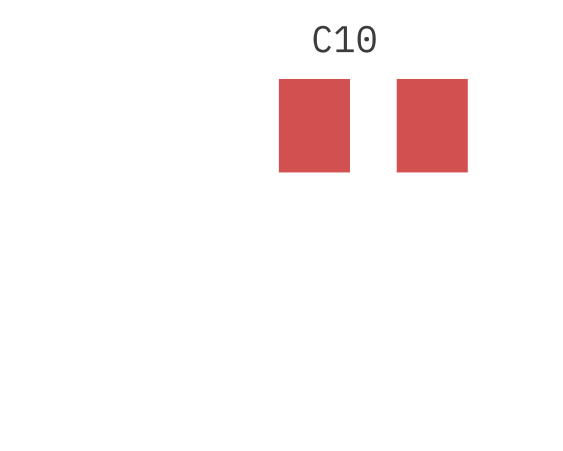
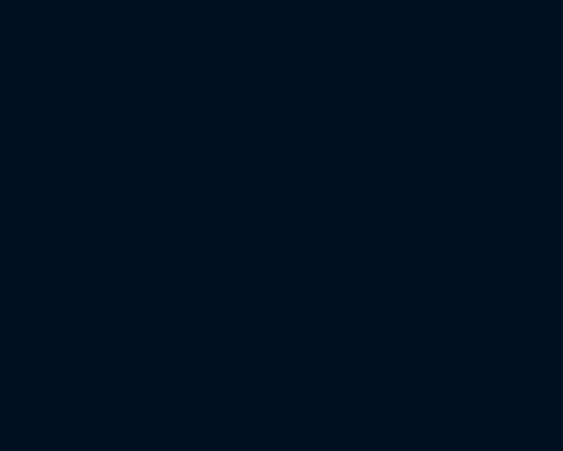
C10: (373, 125) -> none

